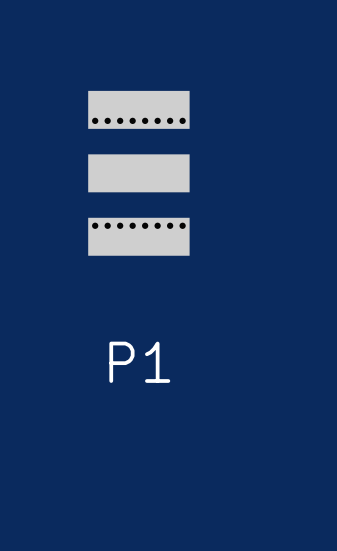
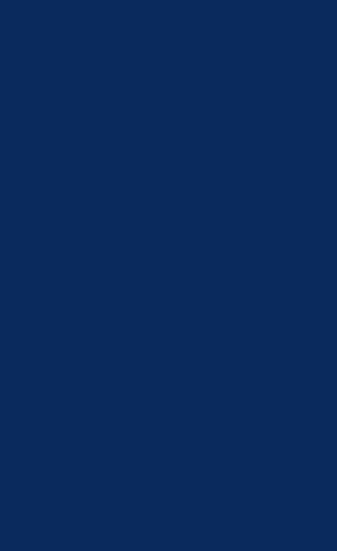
P1: (138, 173) -> none

